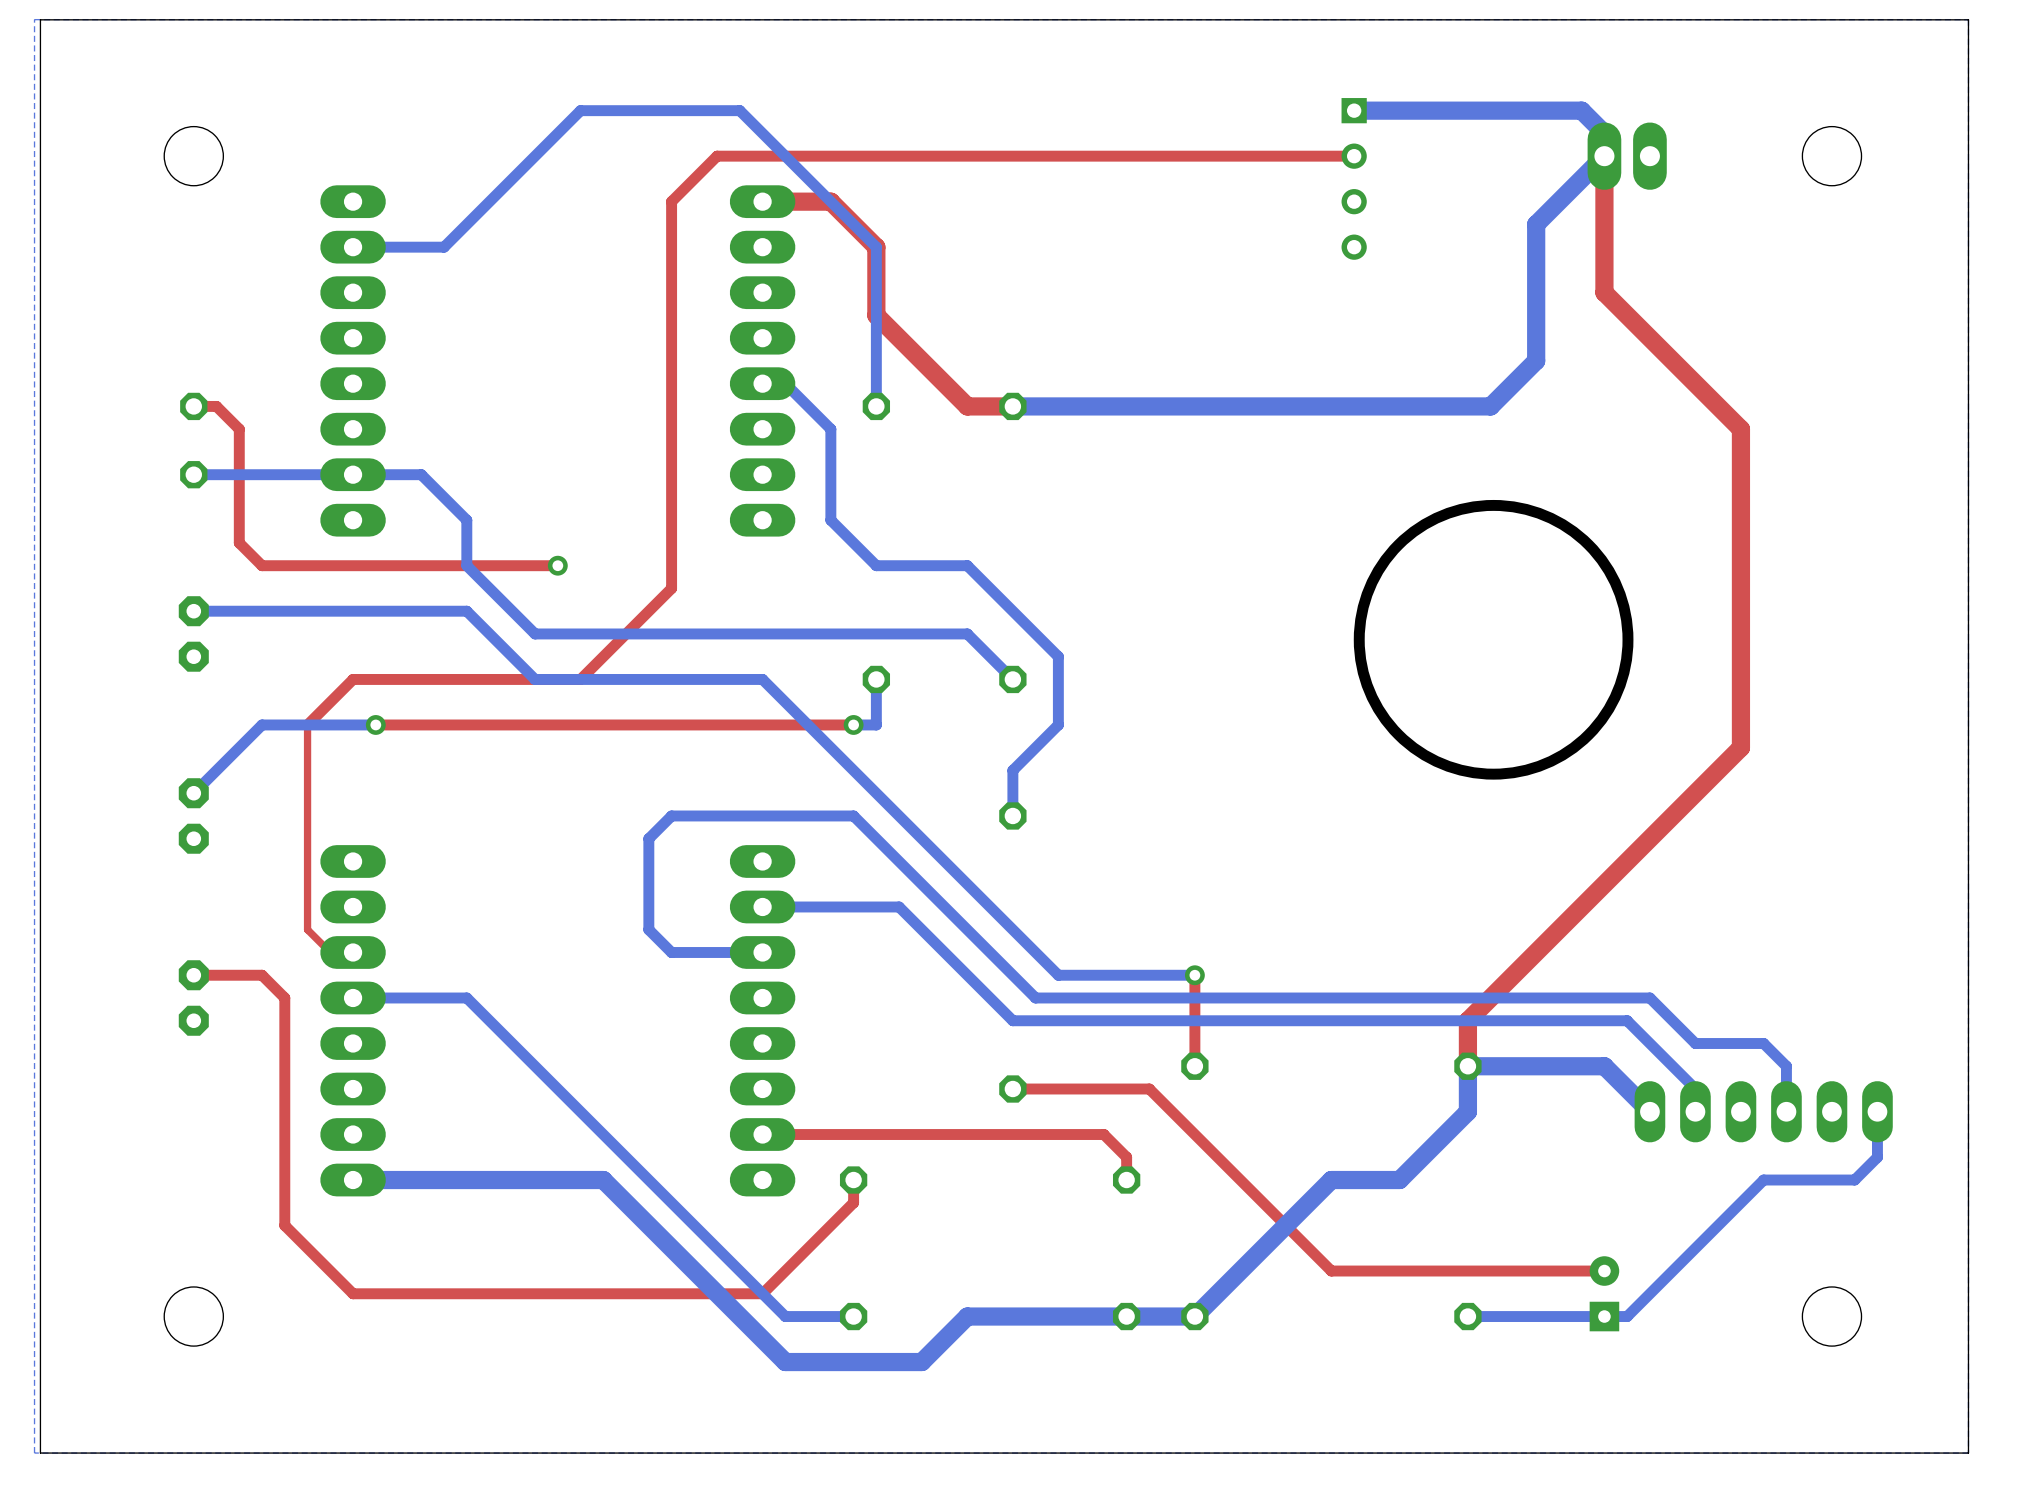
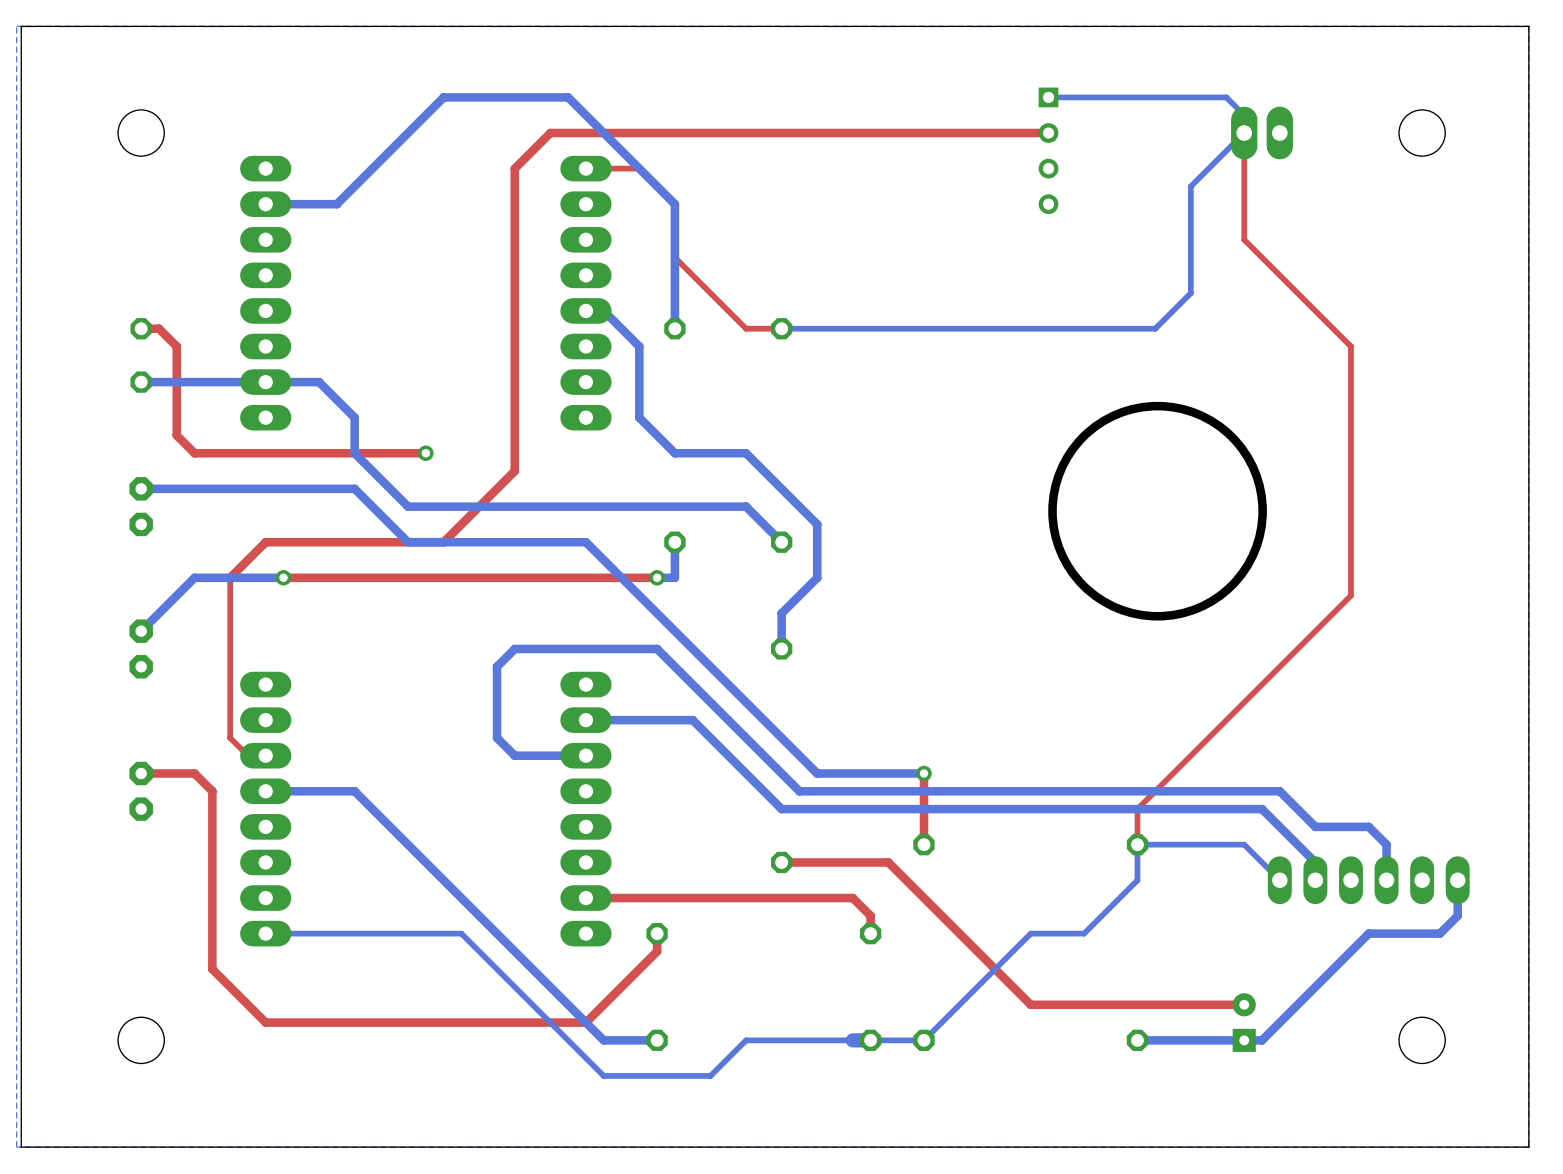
bottom track width: thick (1354, 110) (1581, 110) (1604, 133) -> thin (1048, 97) (1226, 97) (1244, 115)
bottom track width: thick (1604, 156) (1536, 224) (1536, 360) (1490, 406) (1012, 406) -> thin (1244, 133) (1190, 186) (1190, 293) (1155, 328) (781, 328)
top track width: thick (1604, 156) (1604, 292) (1740, 429) (1740, 747) (1467, 1020) (1467, 1066) -> thin (1244, 133) (1244, 239) (1350, 346) (1350, 595) (1137, 809) (1137, 844)
top track width: thick (762, 201) (830, 201) (876, 247) (876, 315) (967, 406) (1012, 406) -> thin (585, 168) (639, 168) (674, 204) (674, 257) (746, 328) (781, 328)
bottom track width: thick (1649, 1111) (1604, 1066) (1467, 1066) (1467, 1111) (1399, 1180) (1331, 1180) (1194, 1316) (1126, 1316) -> thin (1279, 880) (1244, 844) (1137, 844) (1137, 880) (1084, 933) (1030, 933) (923, 1040) (870, 1040)
bottom track width: thick (353, 1180) (603, 1180) (785, 1362) (921, 1362) (967, 1316) (1103, 1316) -> thin (265, 933) (461, 933) (603, 1075) (710, 1075) (746, 1040) (852, 1040)

